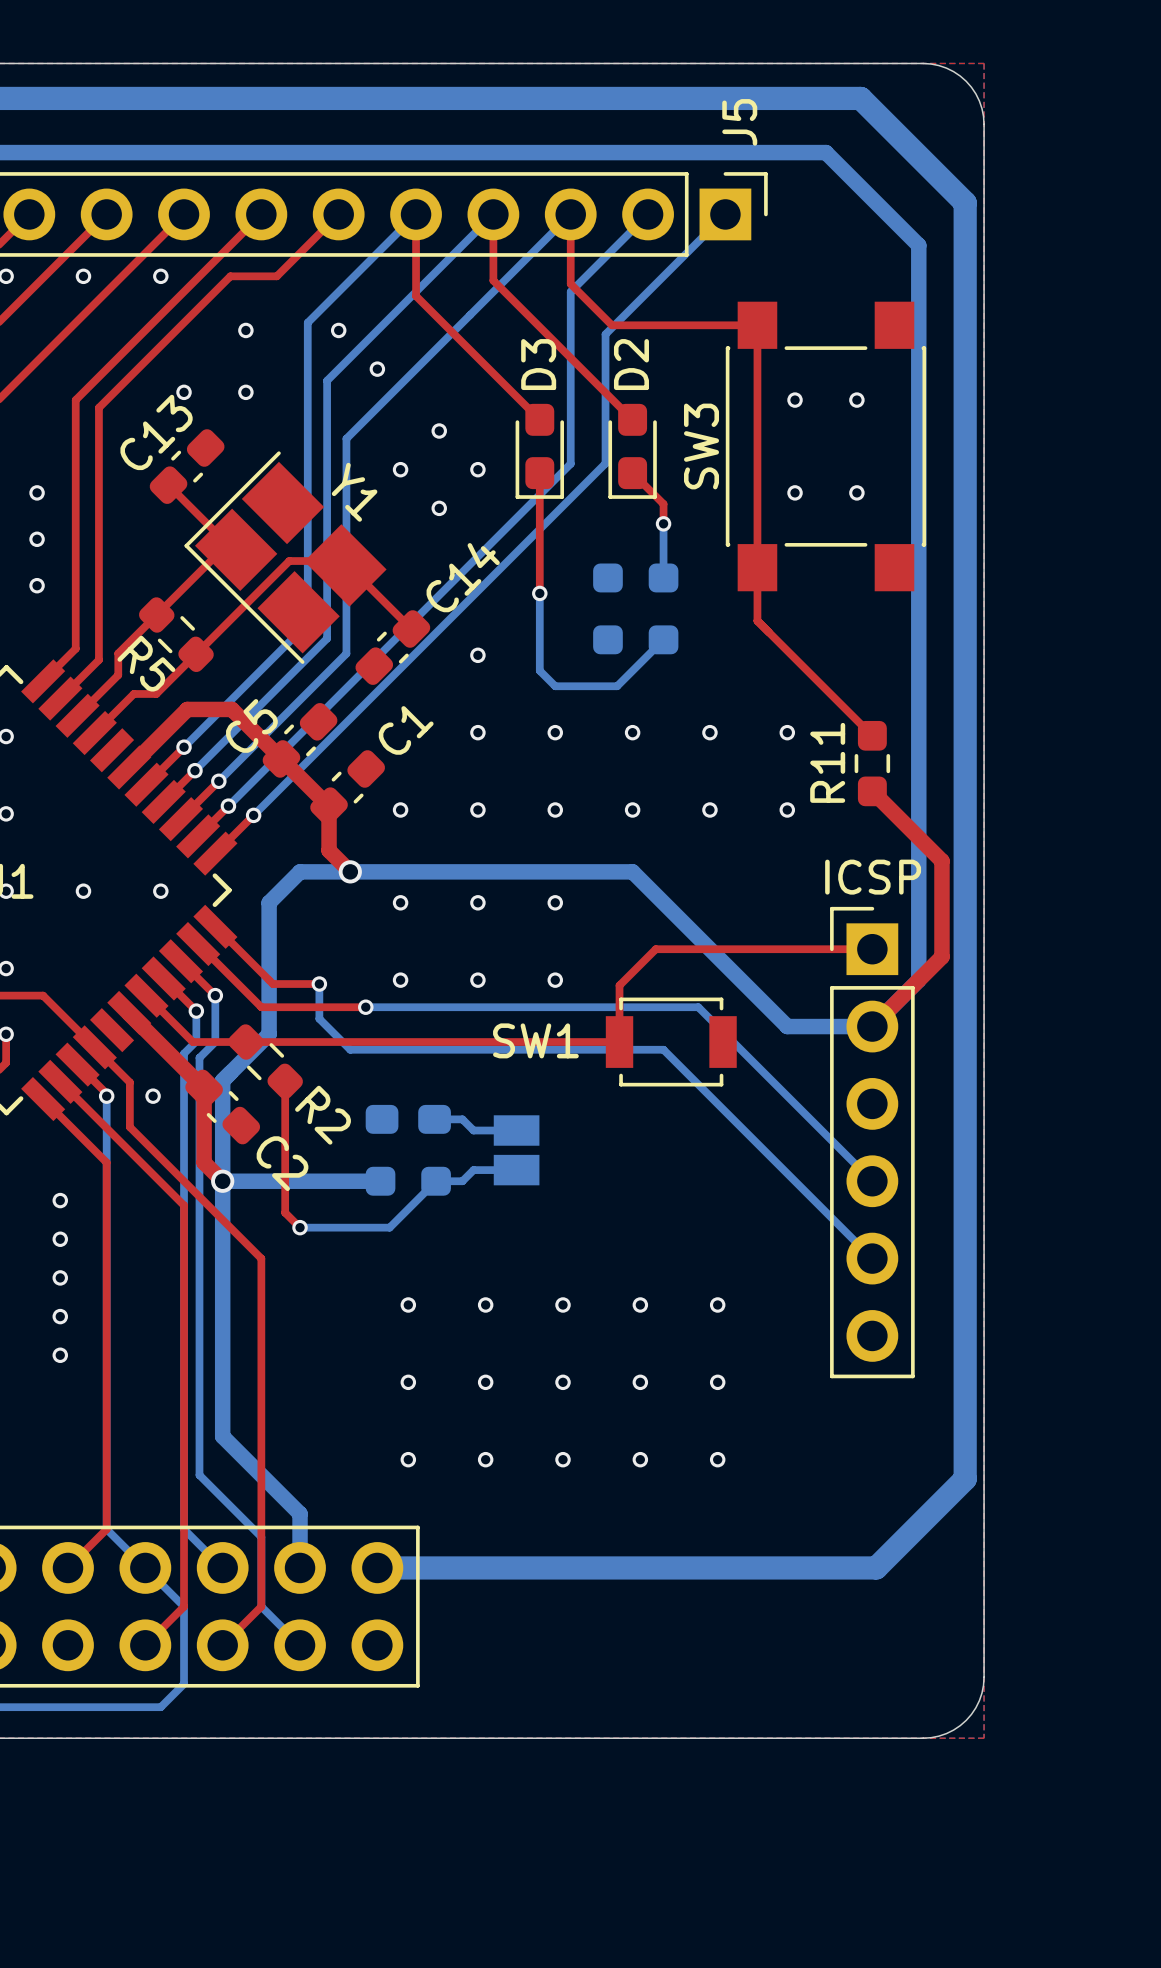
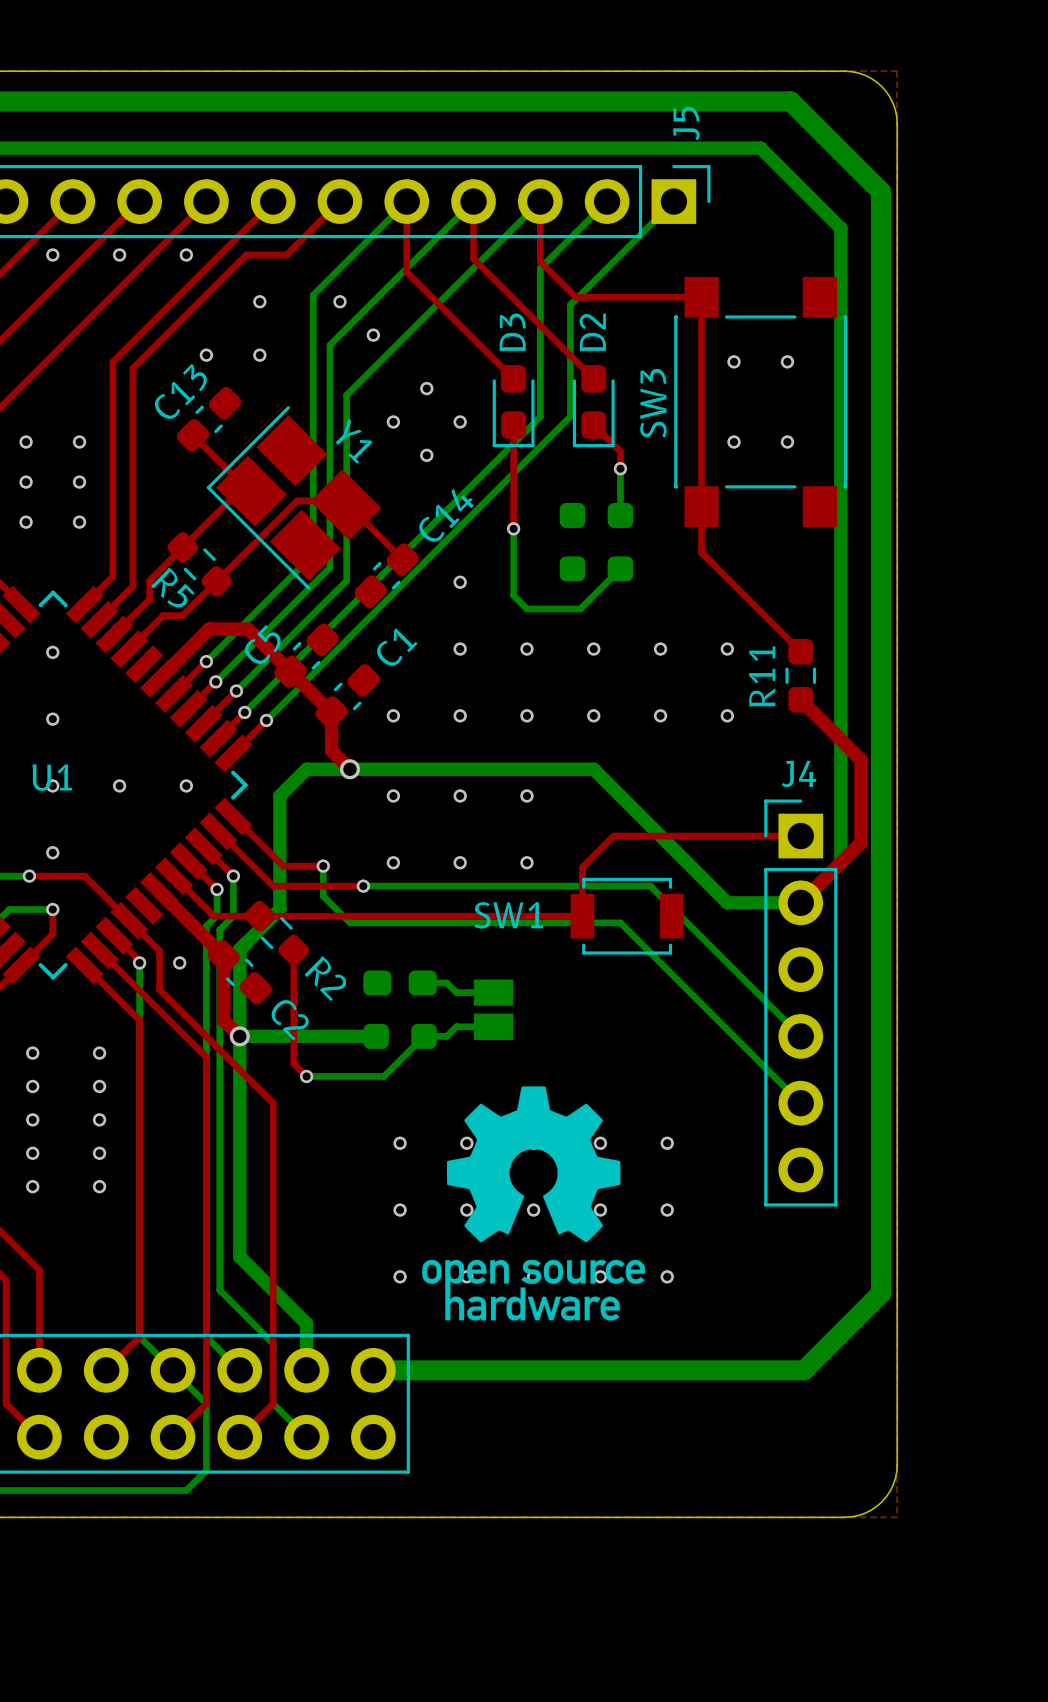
ICSP name: ICSP (873, 877) -> J4 (799, 773)
drawing: none -> [422, 1086, 646, 1321]

